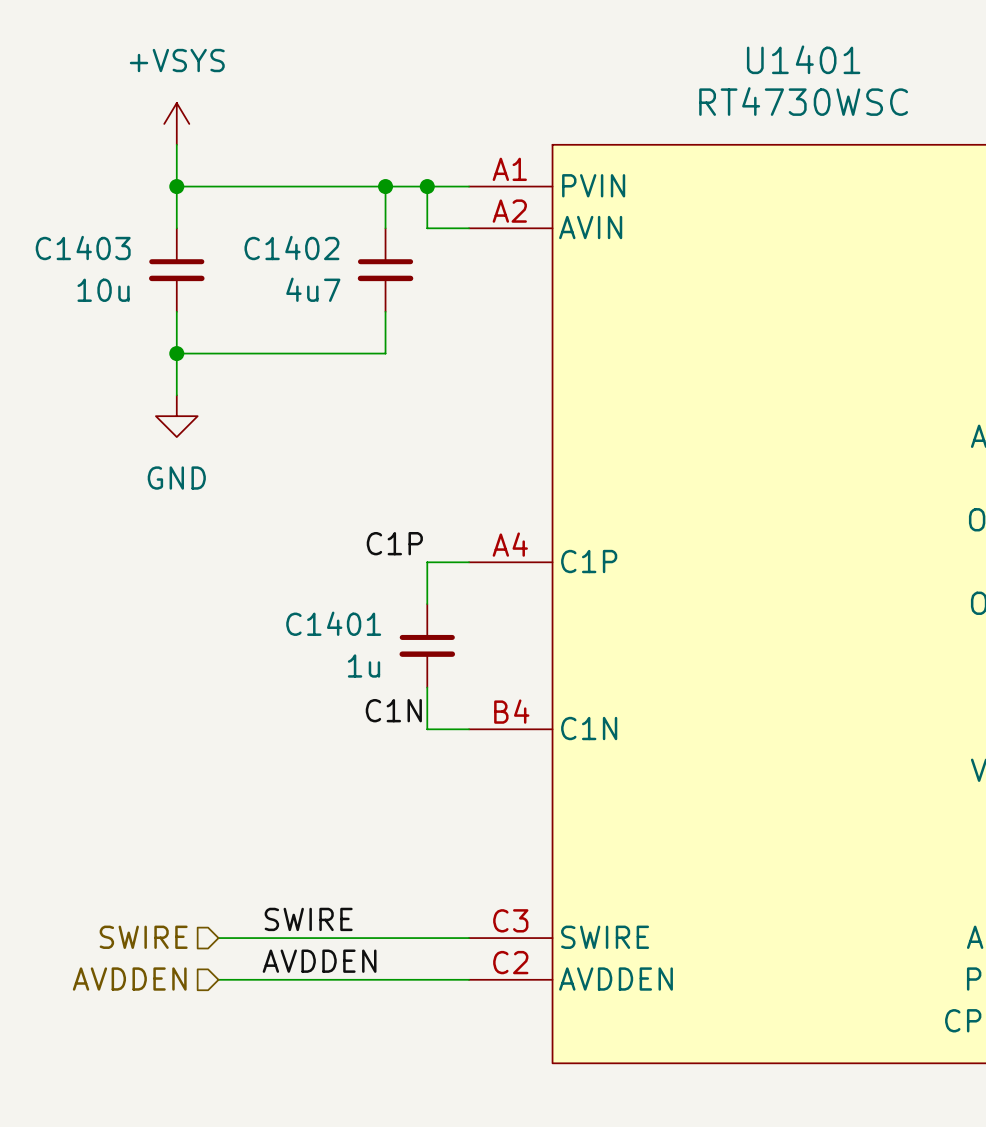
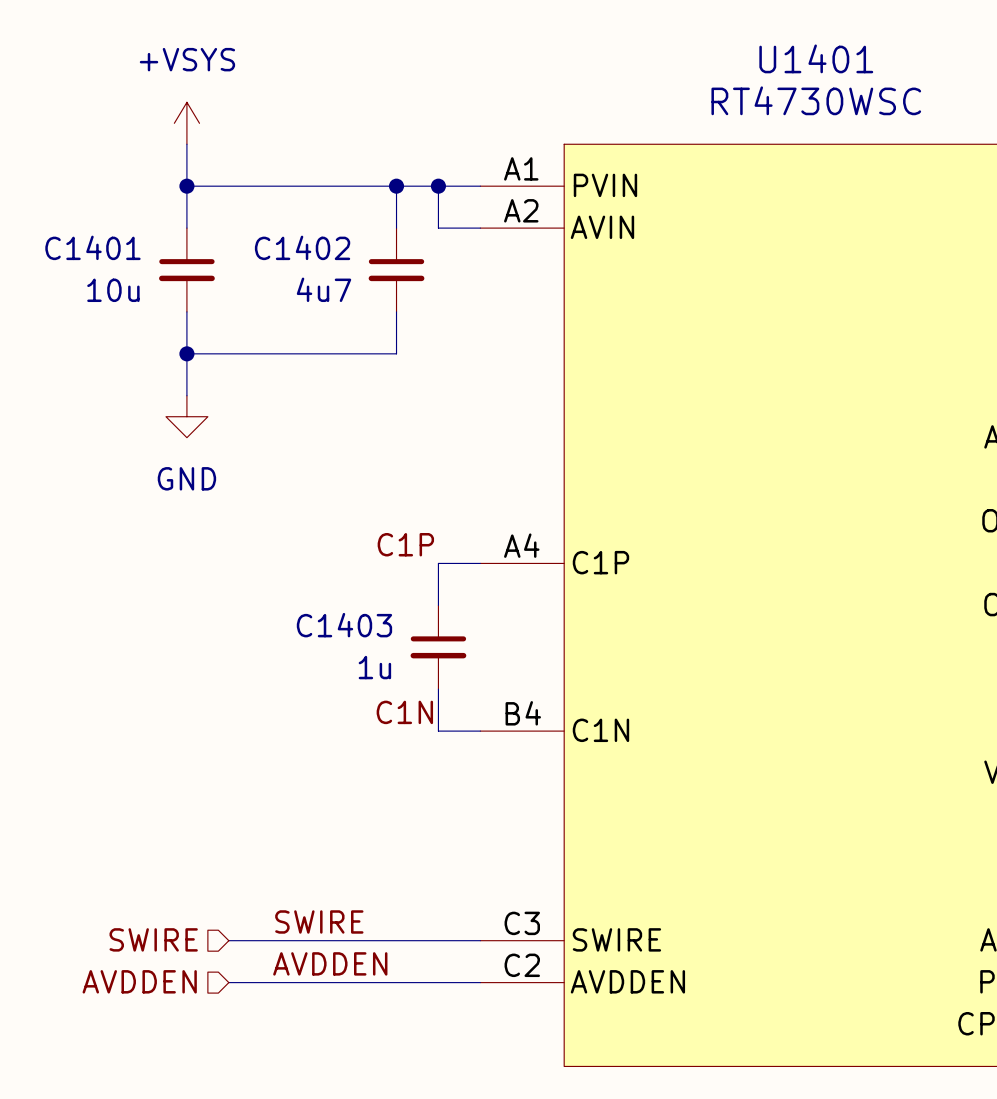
C1403 name: C1403 (83, 248) -> C1401 (92, 247)
C1401 name: C1401 (333, 623) -> C1403 (344, 625)

